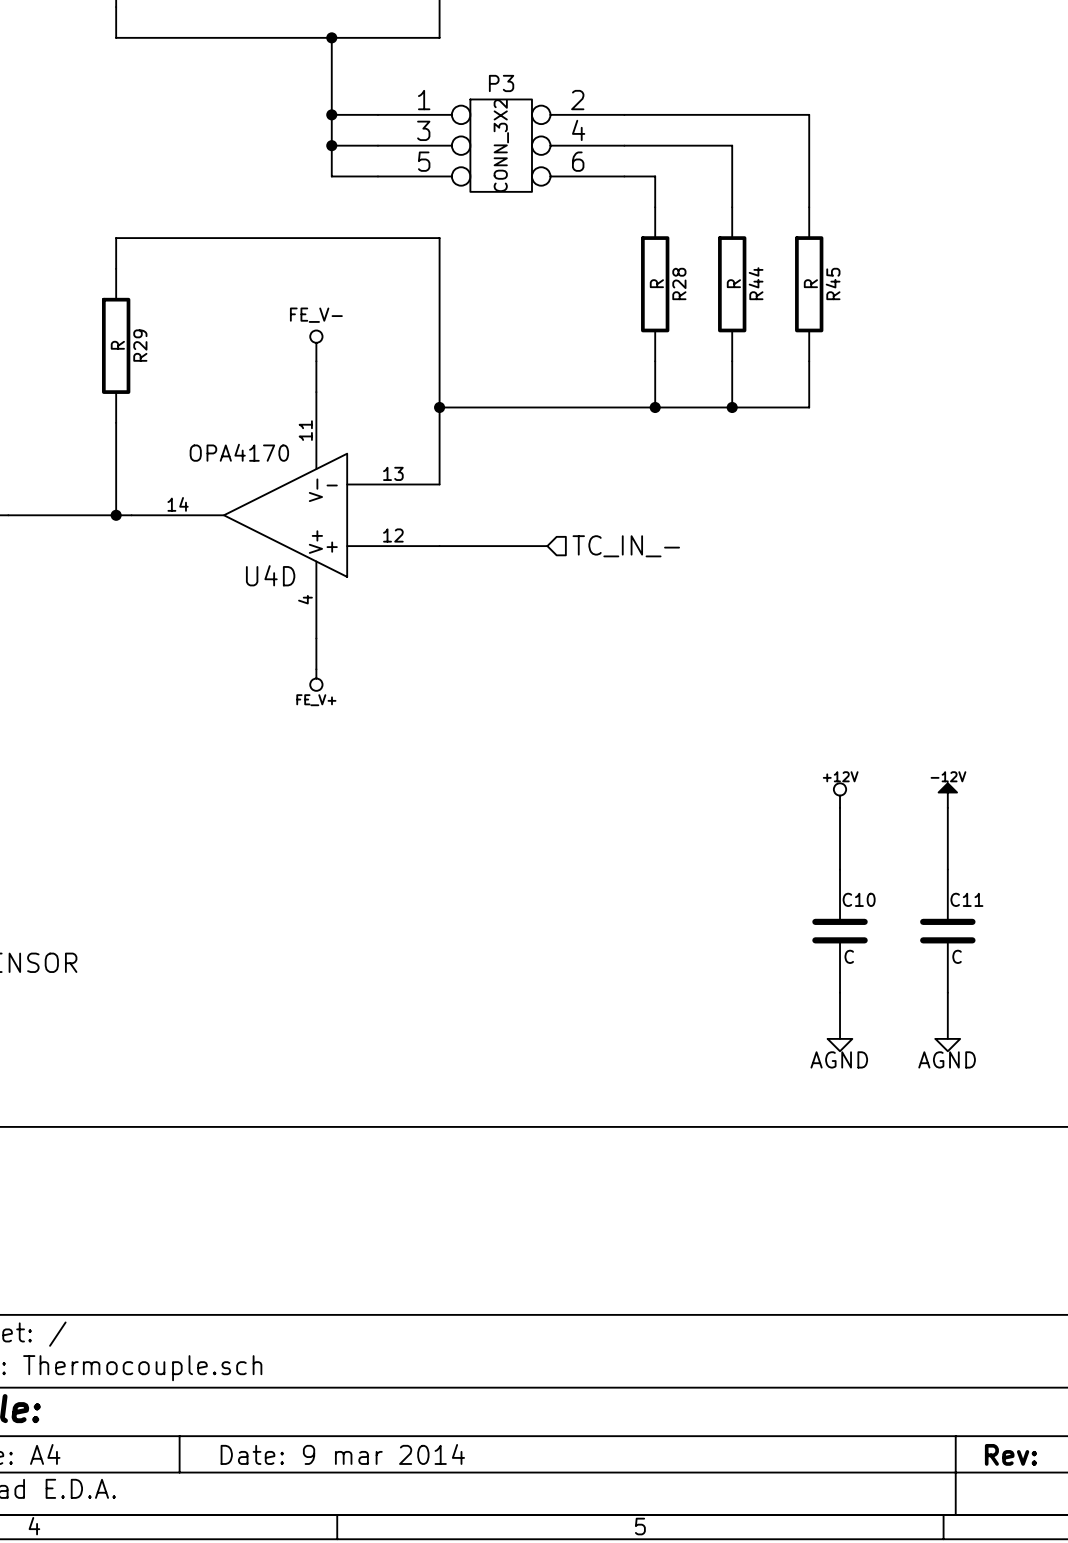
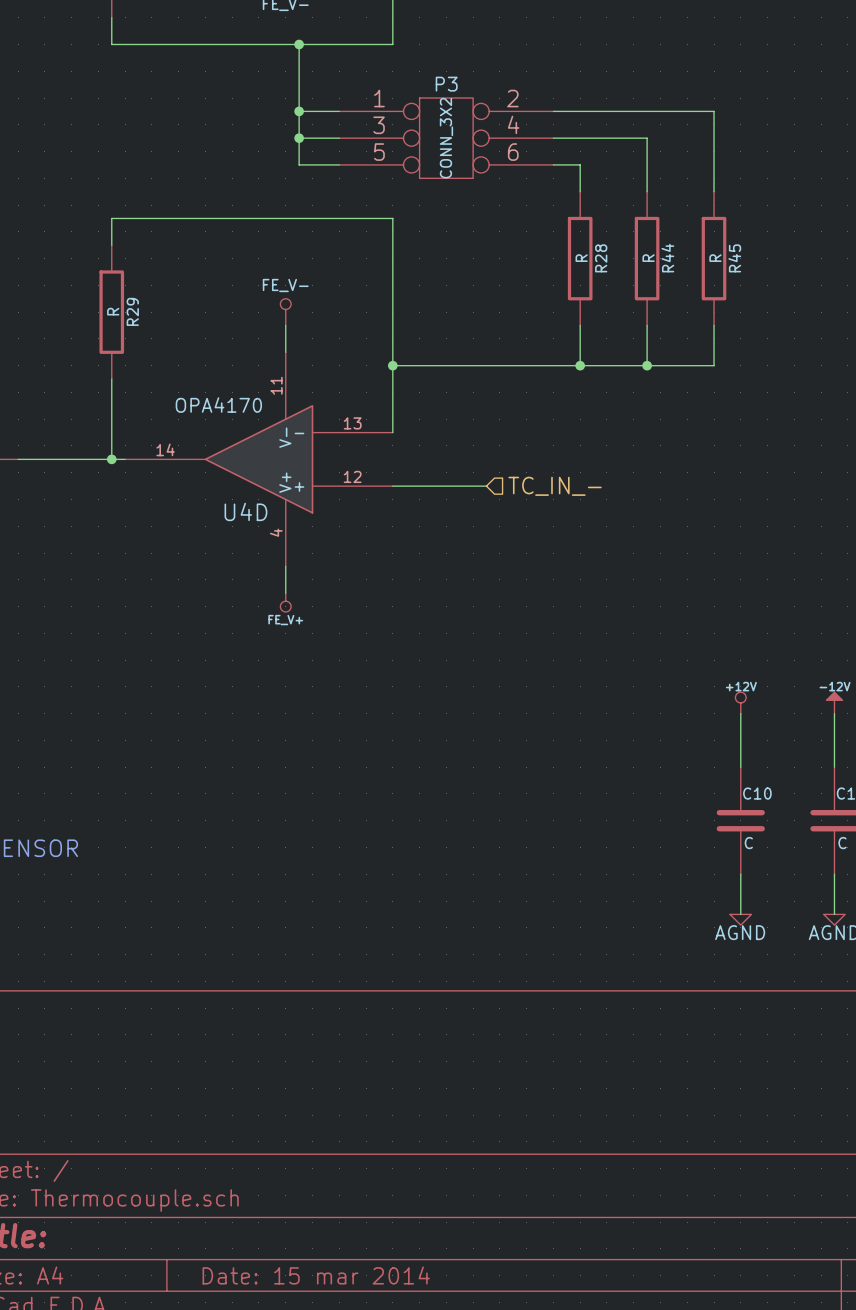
title block: Date: 9 mar 2014 (342, 1454) -> Date: 15 mar 2014 (316, 1275)

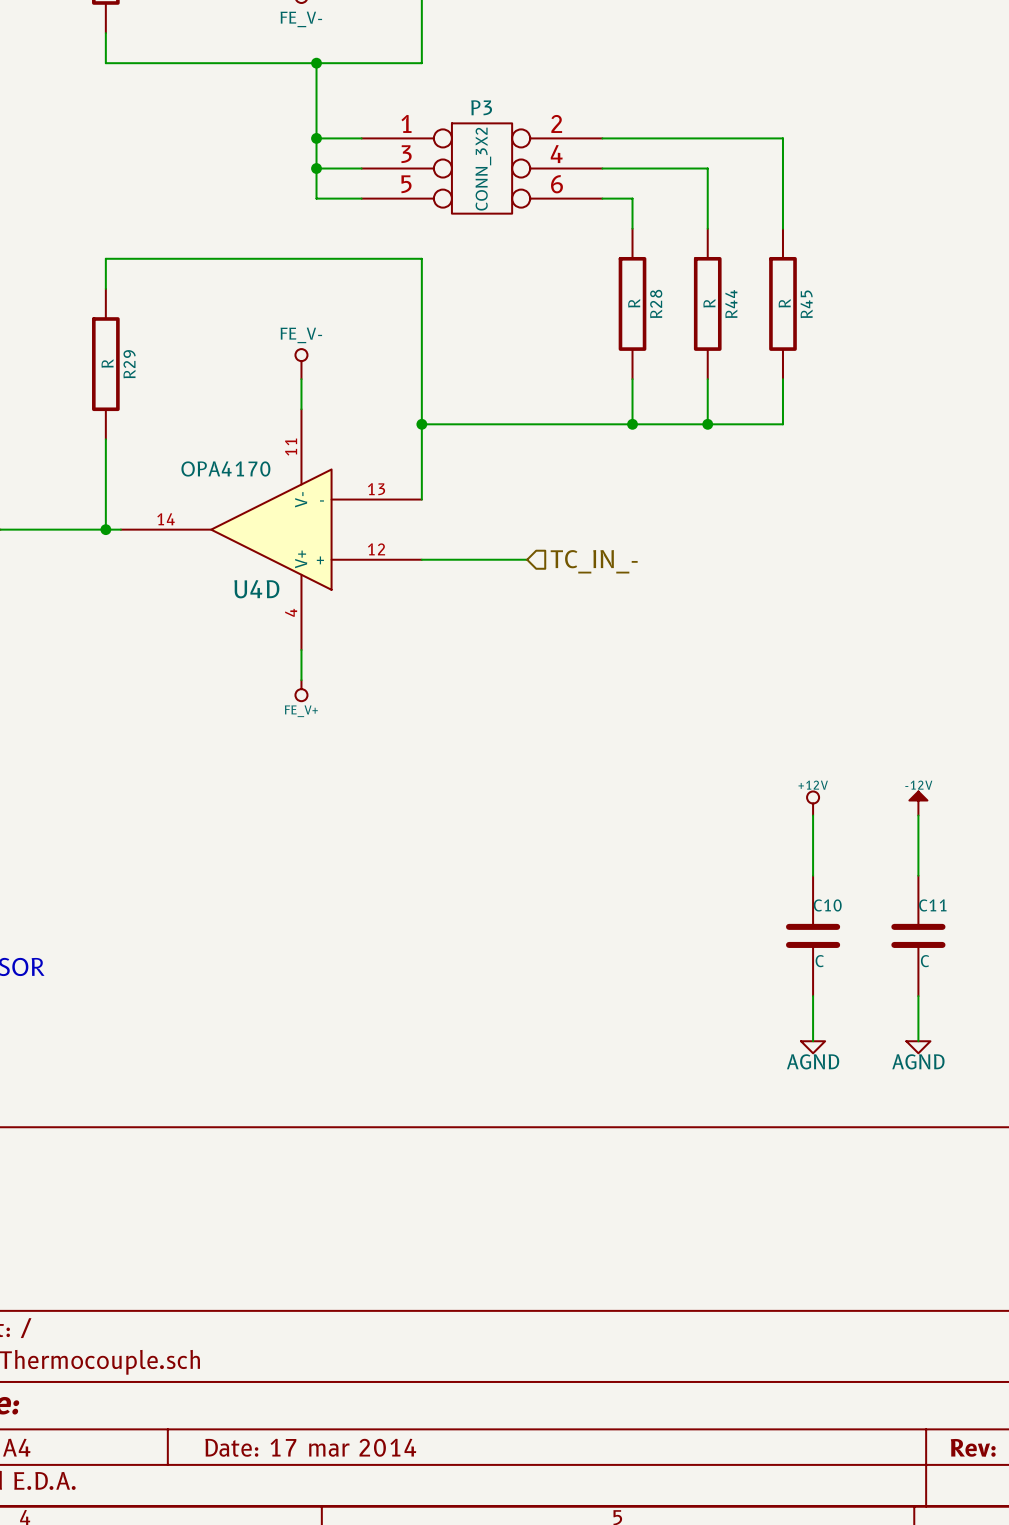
title block: Date: 15 mar 2014 (316, 1275) -> Date: 17 mar 2014 (310, 1447)

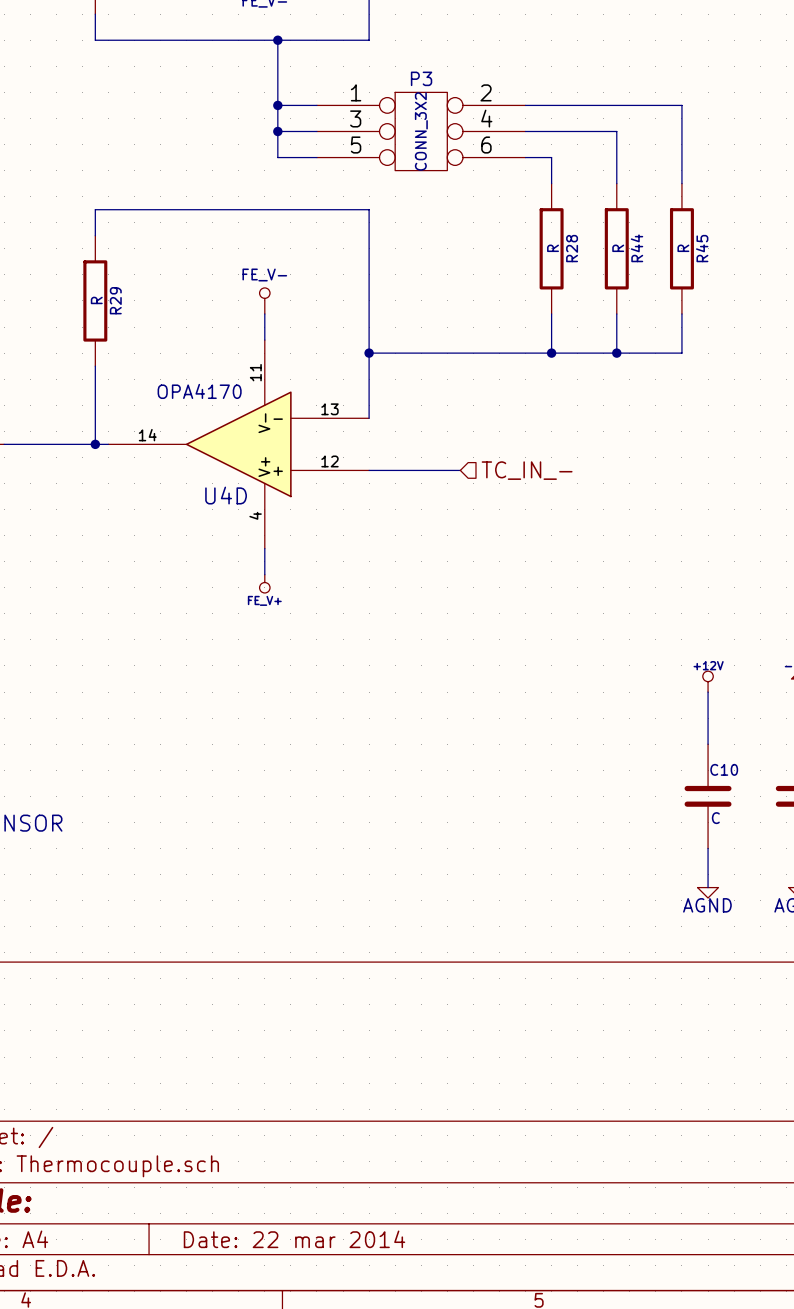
title block: Date: 17 mar 2014 (310, 1447) -> Date: 22 mar 2014 (294, 1239)

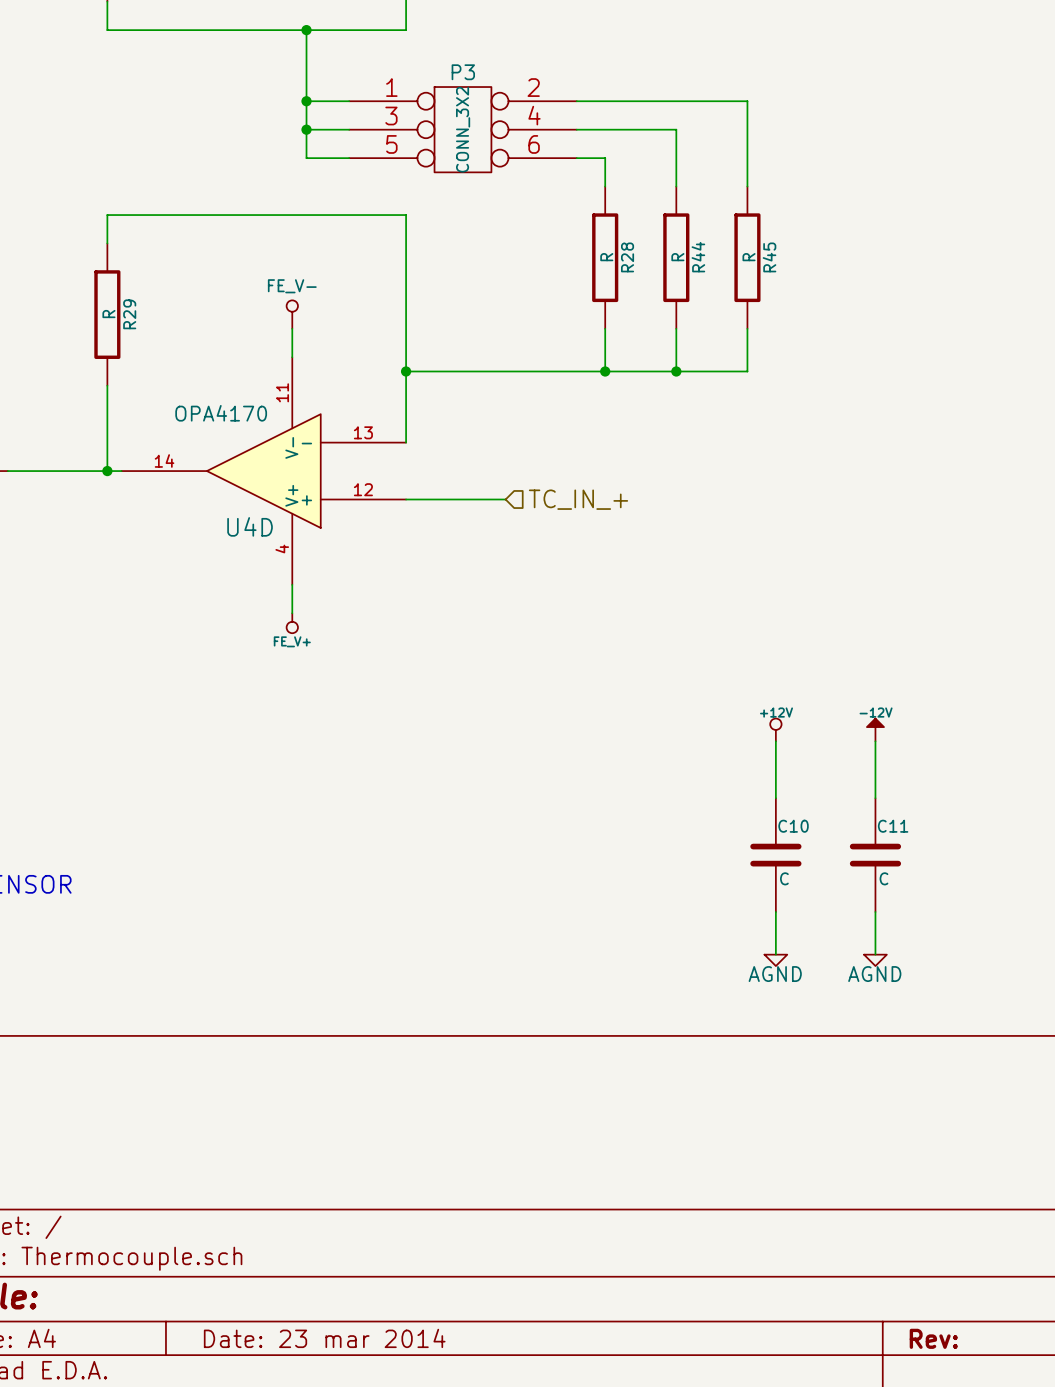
hierarchical label: TC_IN_- (527, 470) -> TC_IN_+ (578, 499)
title block: Date: 22 mar 2014 (294, 1239) -> Date: 23 mar 2014 (324, 1338)

